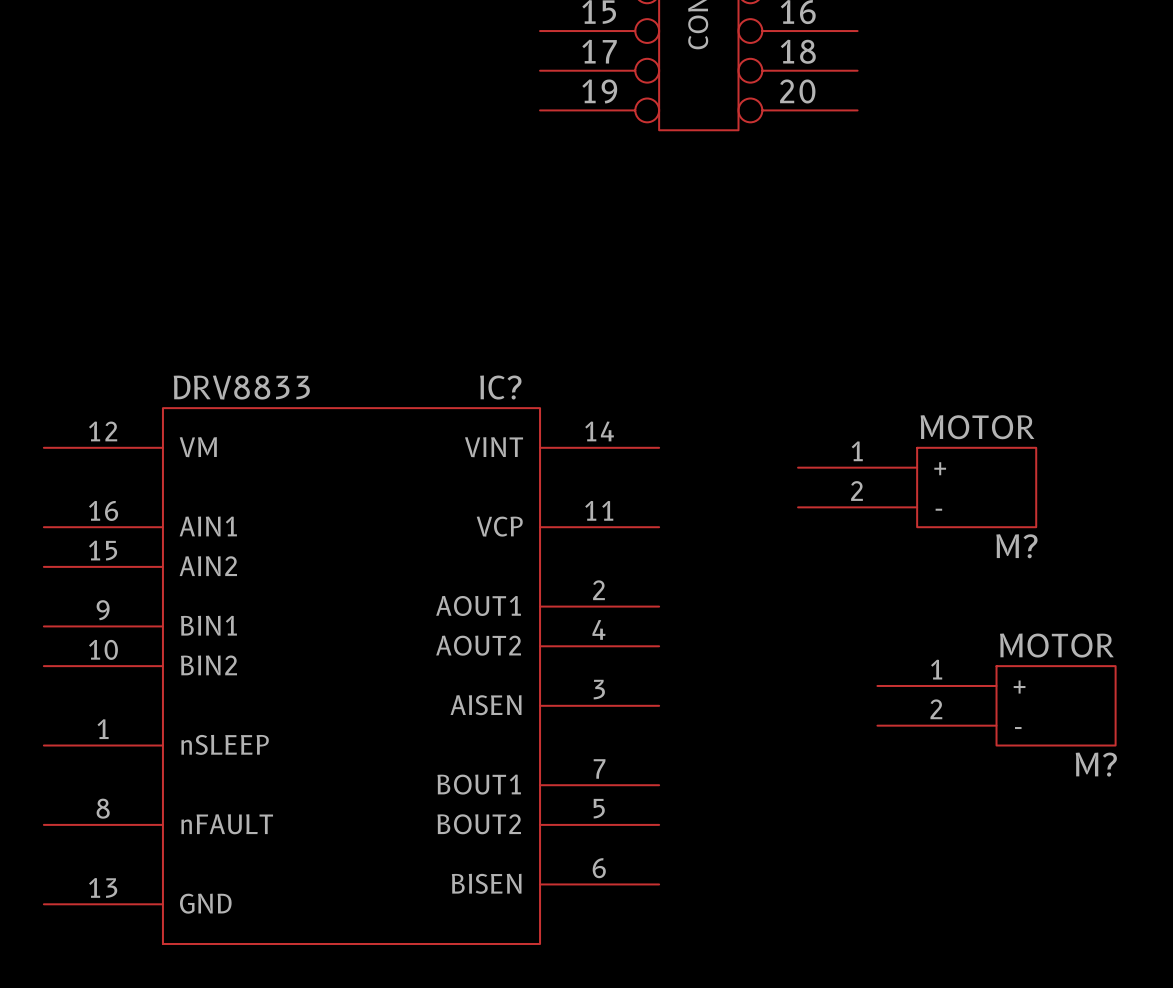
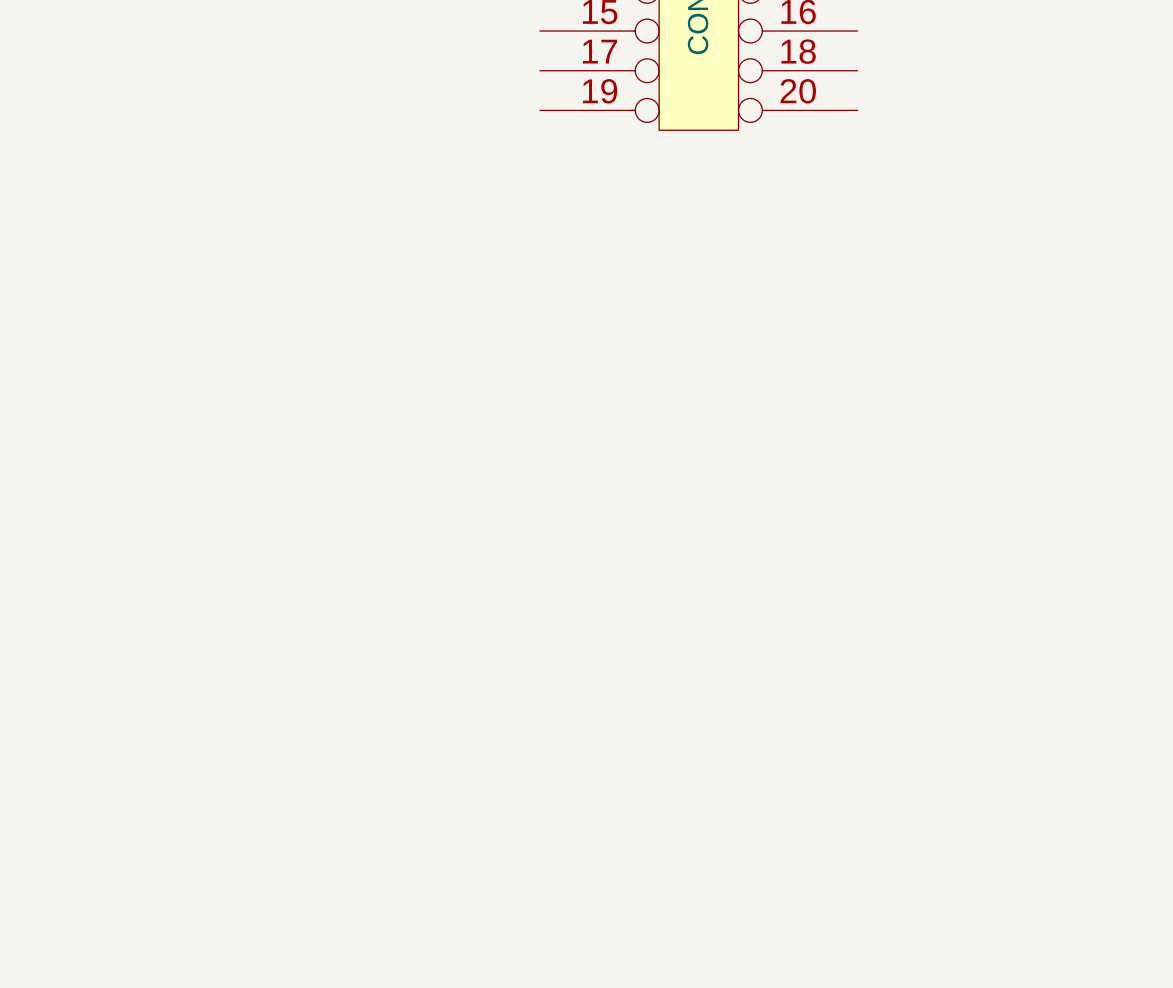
M?: MOTOR (917, 487) -> none
IC?: DRV8833 (351, 676) -> none
M?: MOTOR (996, 705) -> none

